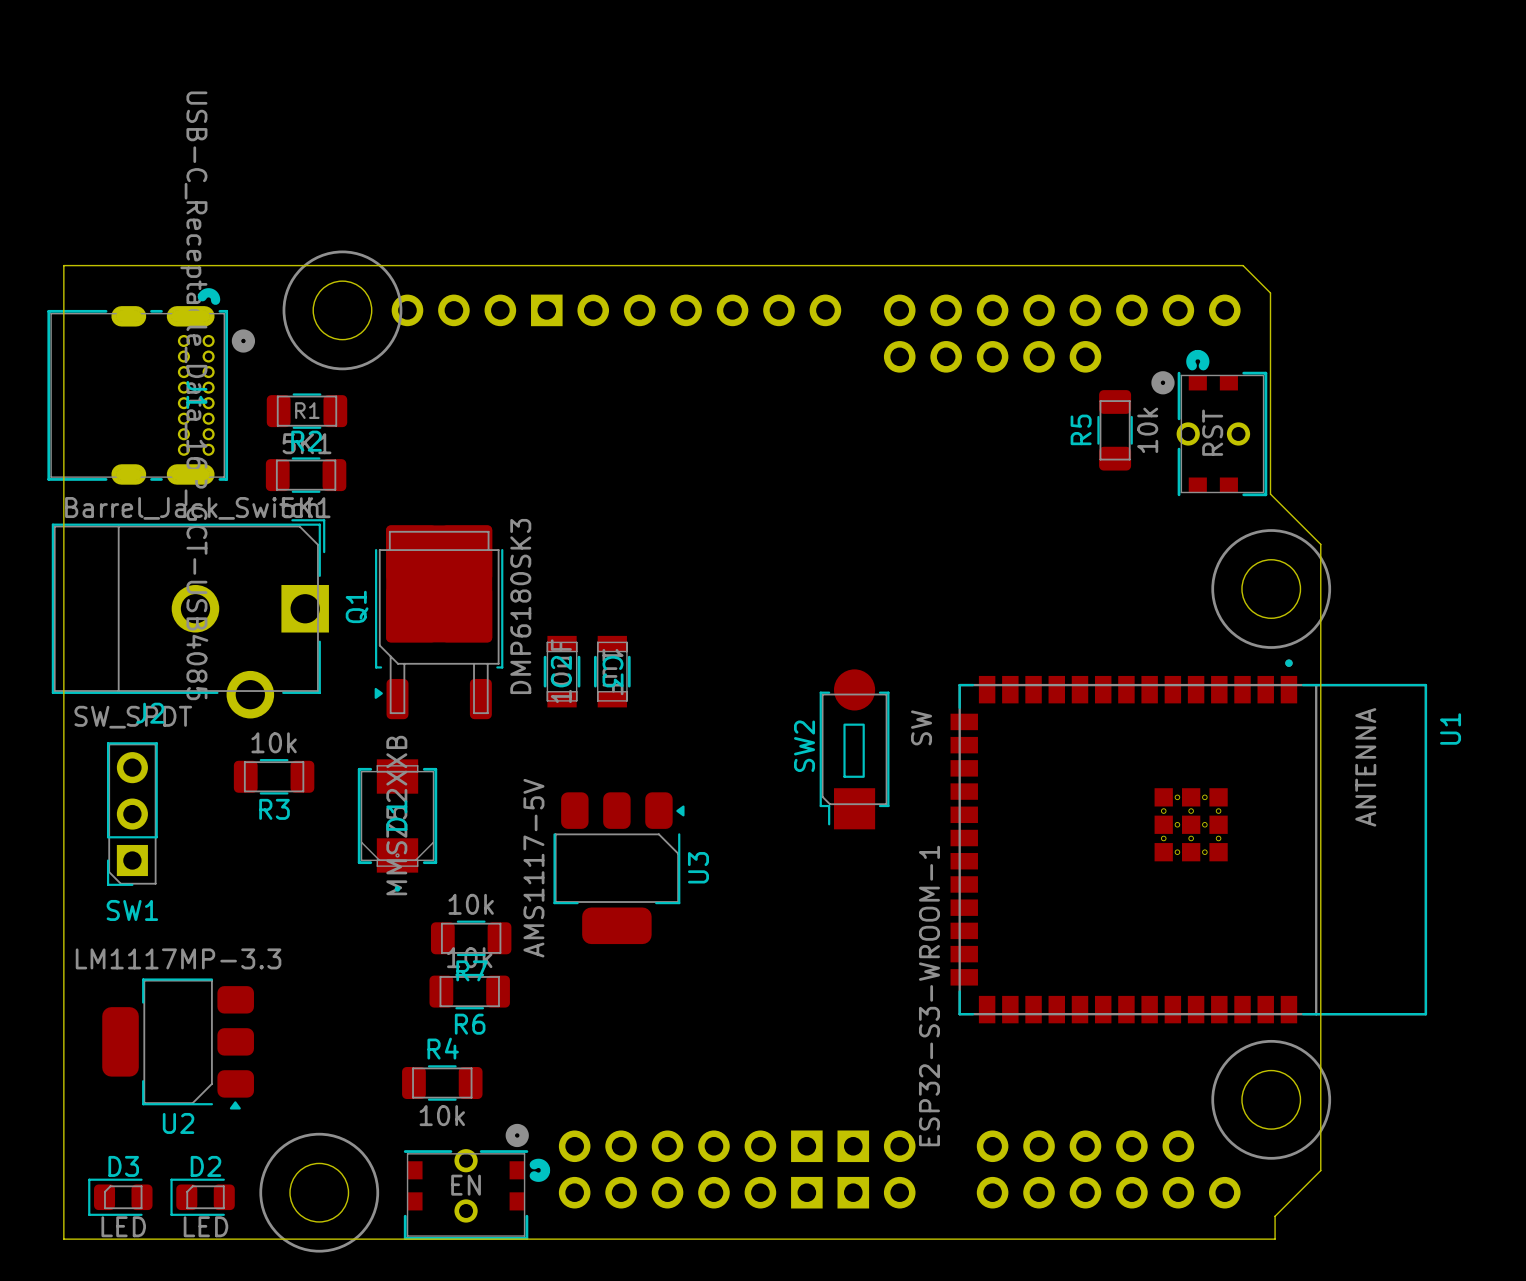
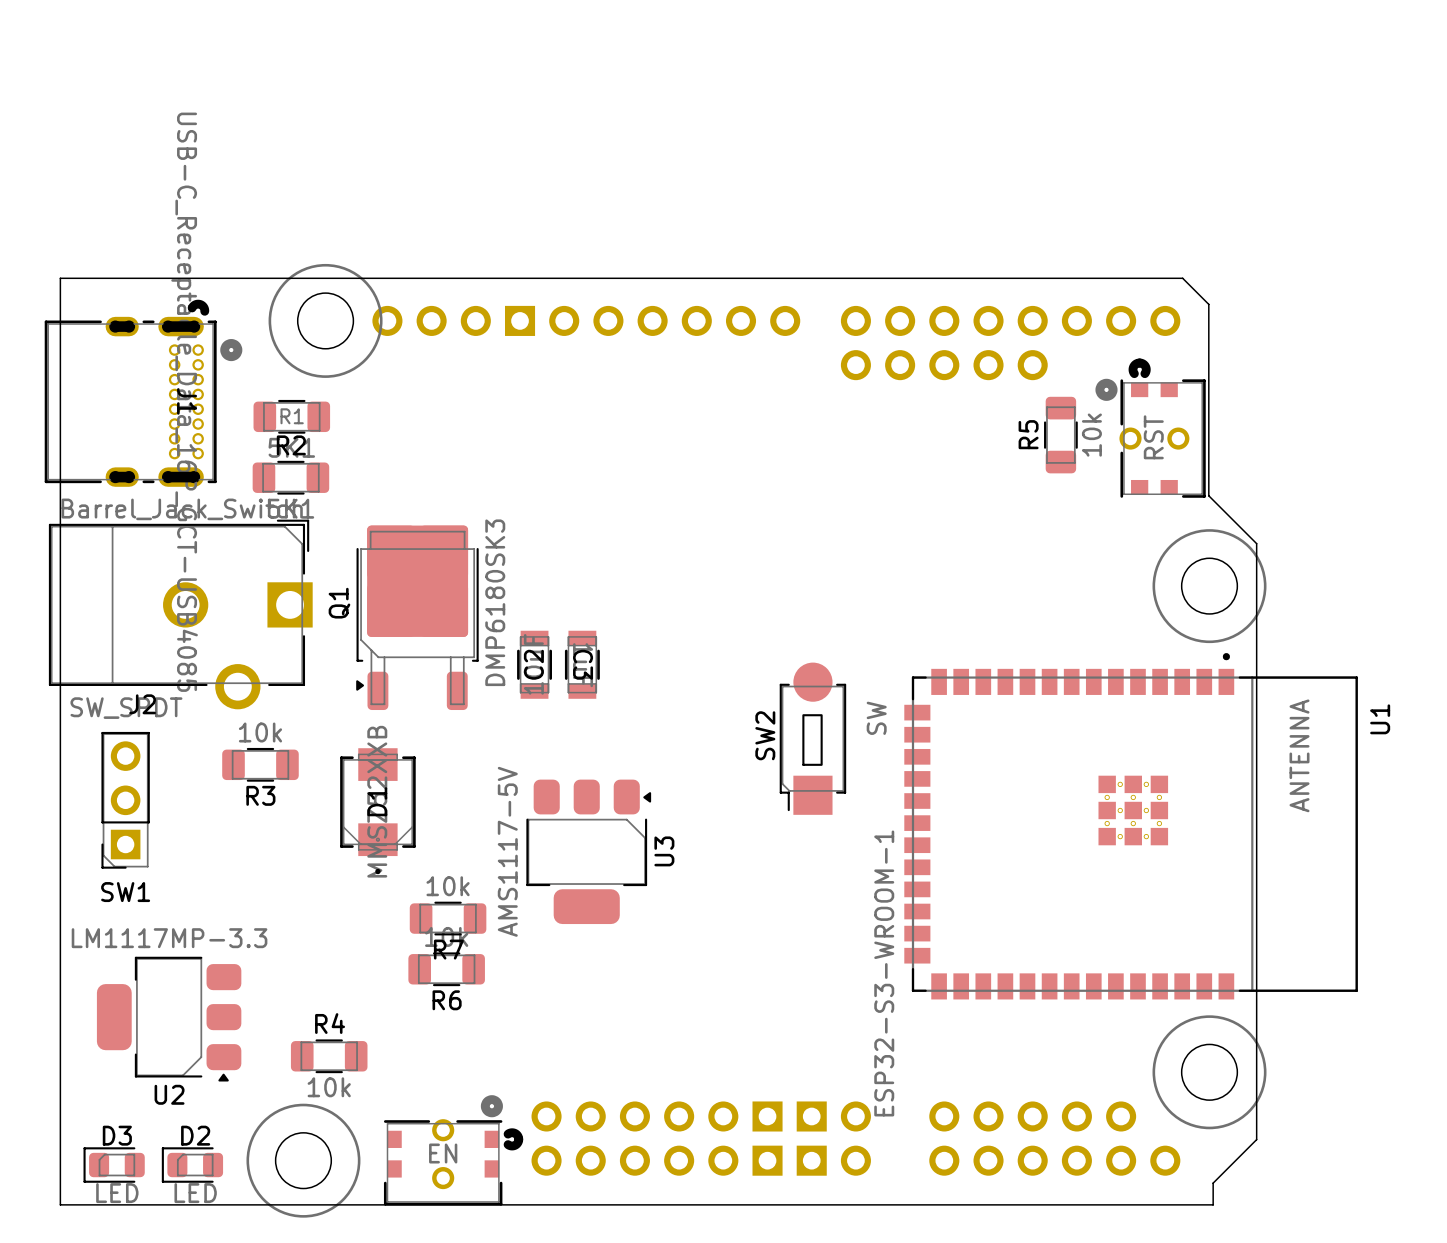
R4 position: (442, 1083) -> (329, 1056)

